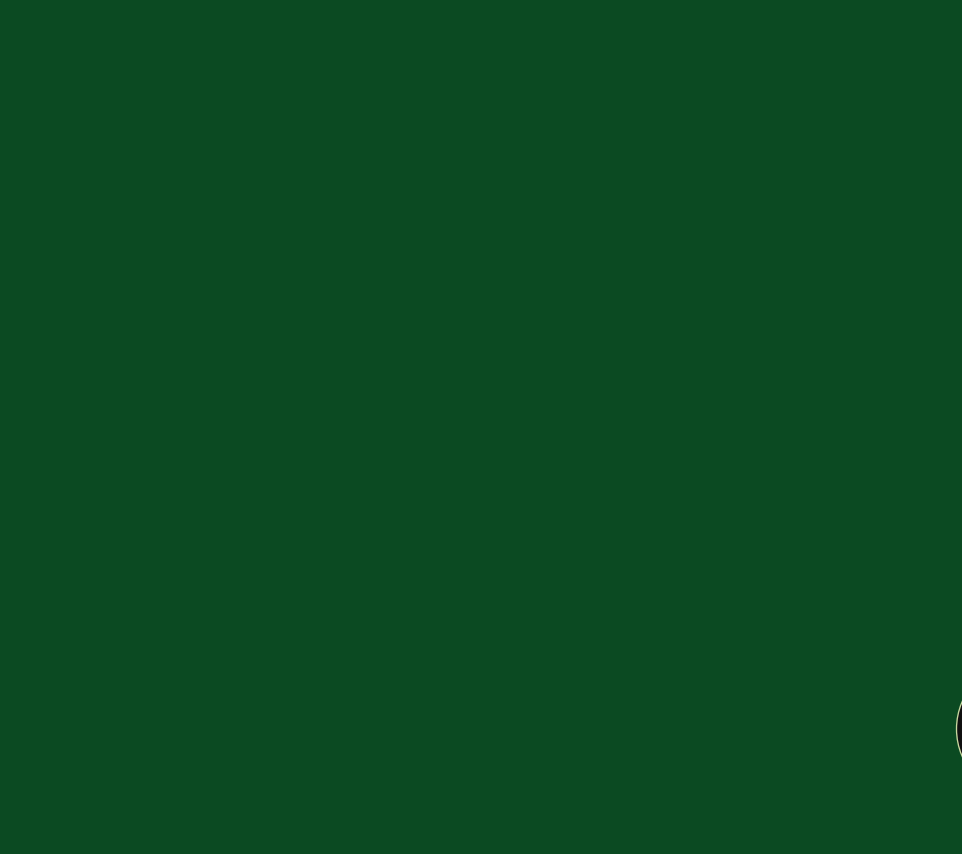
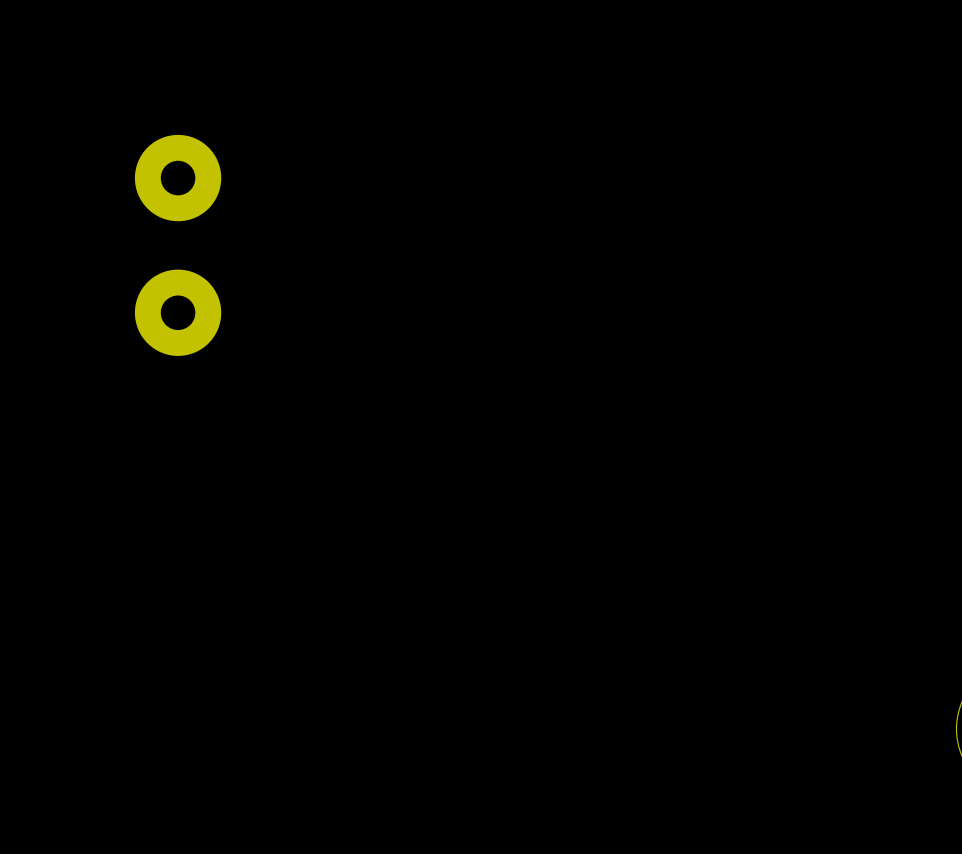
part: none -> (178, 245)

